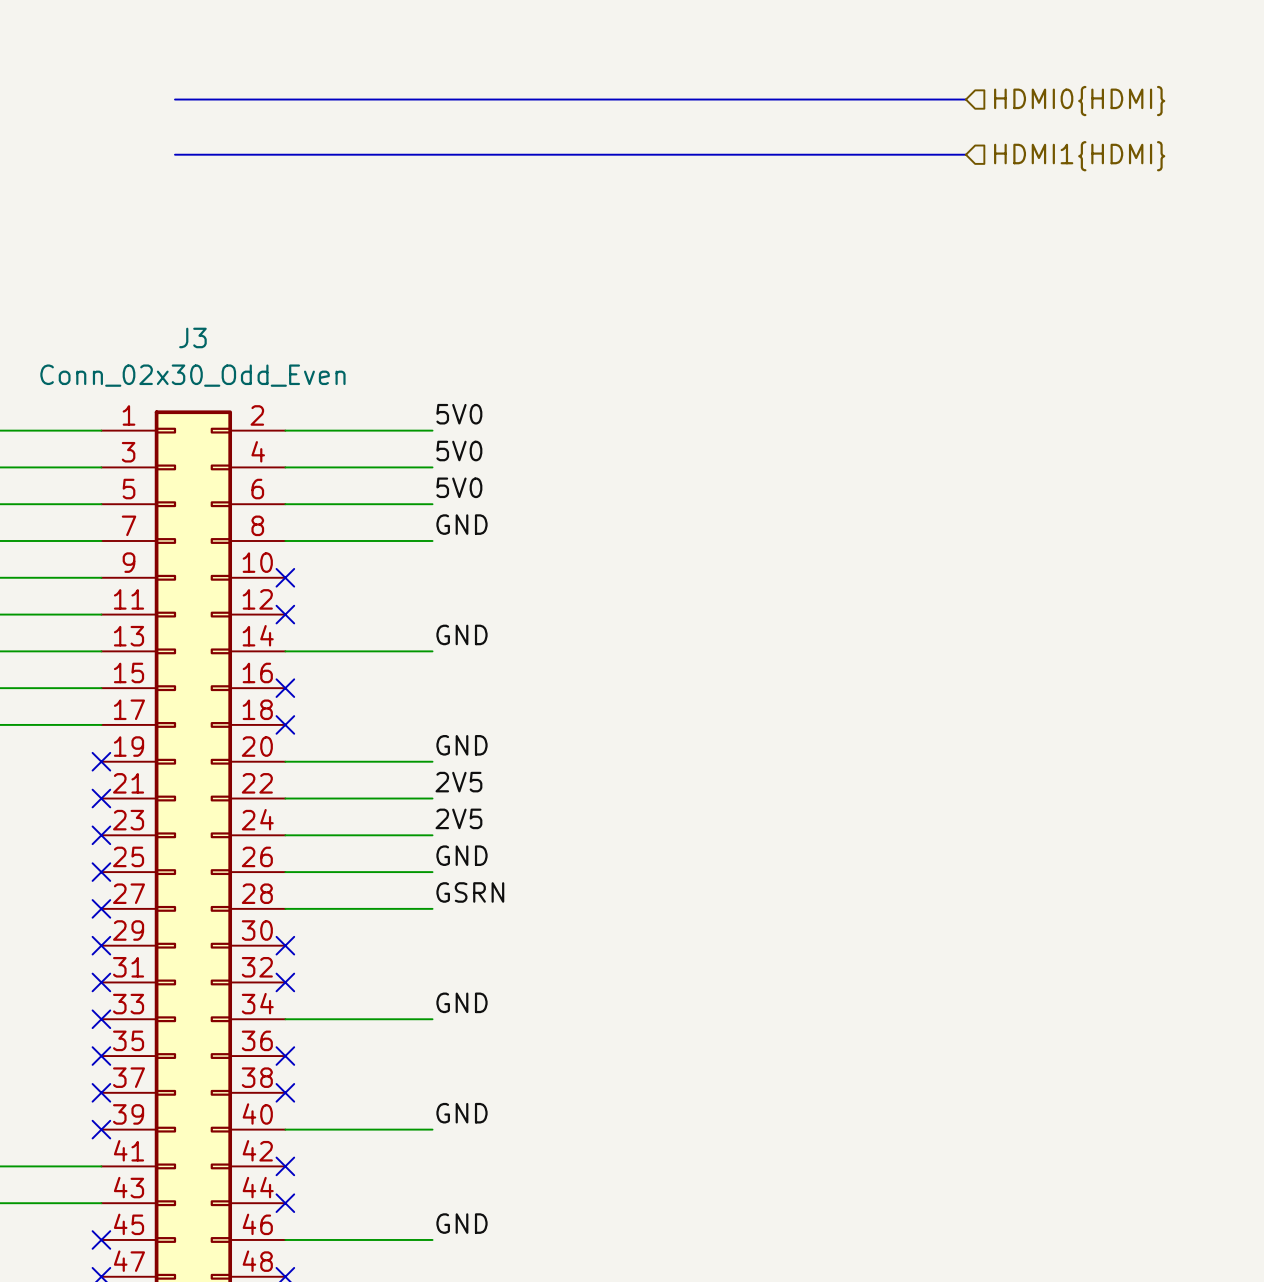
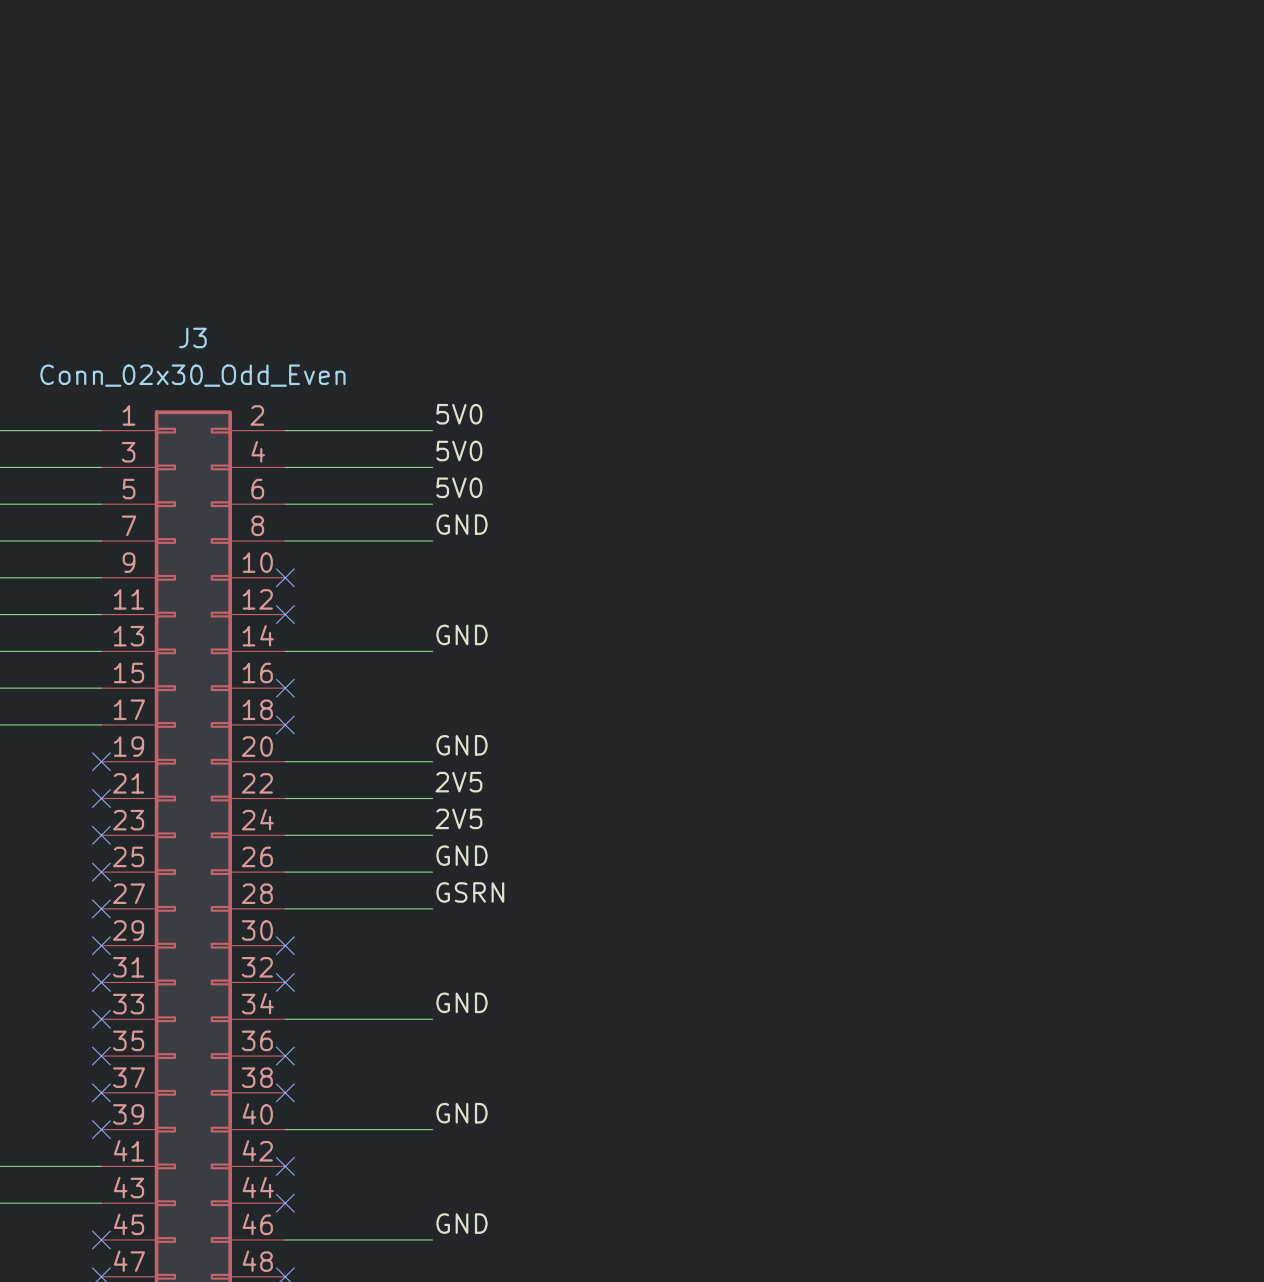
bus: (174, 99) (965, 99) -> none
hierarchical label: HDMI0{HDMI} (1079, 101) -> none
bus: (174, 154) (965, 154) -> none
hierarchical label: HDMI1{HDMI} (1079, 156) -> none

